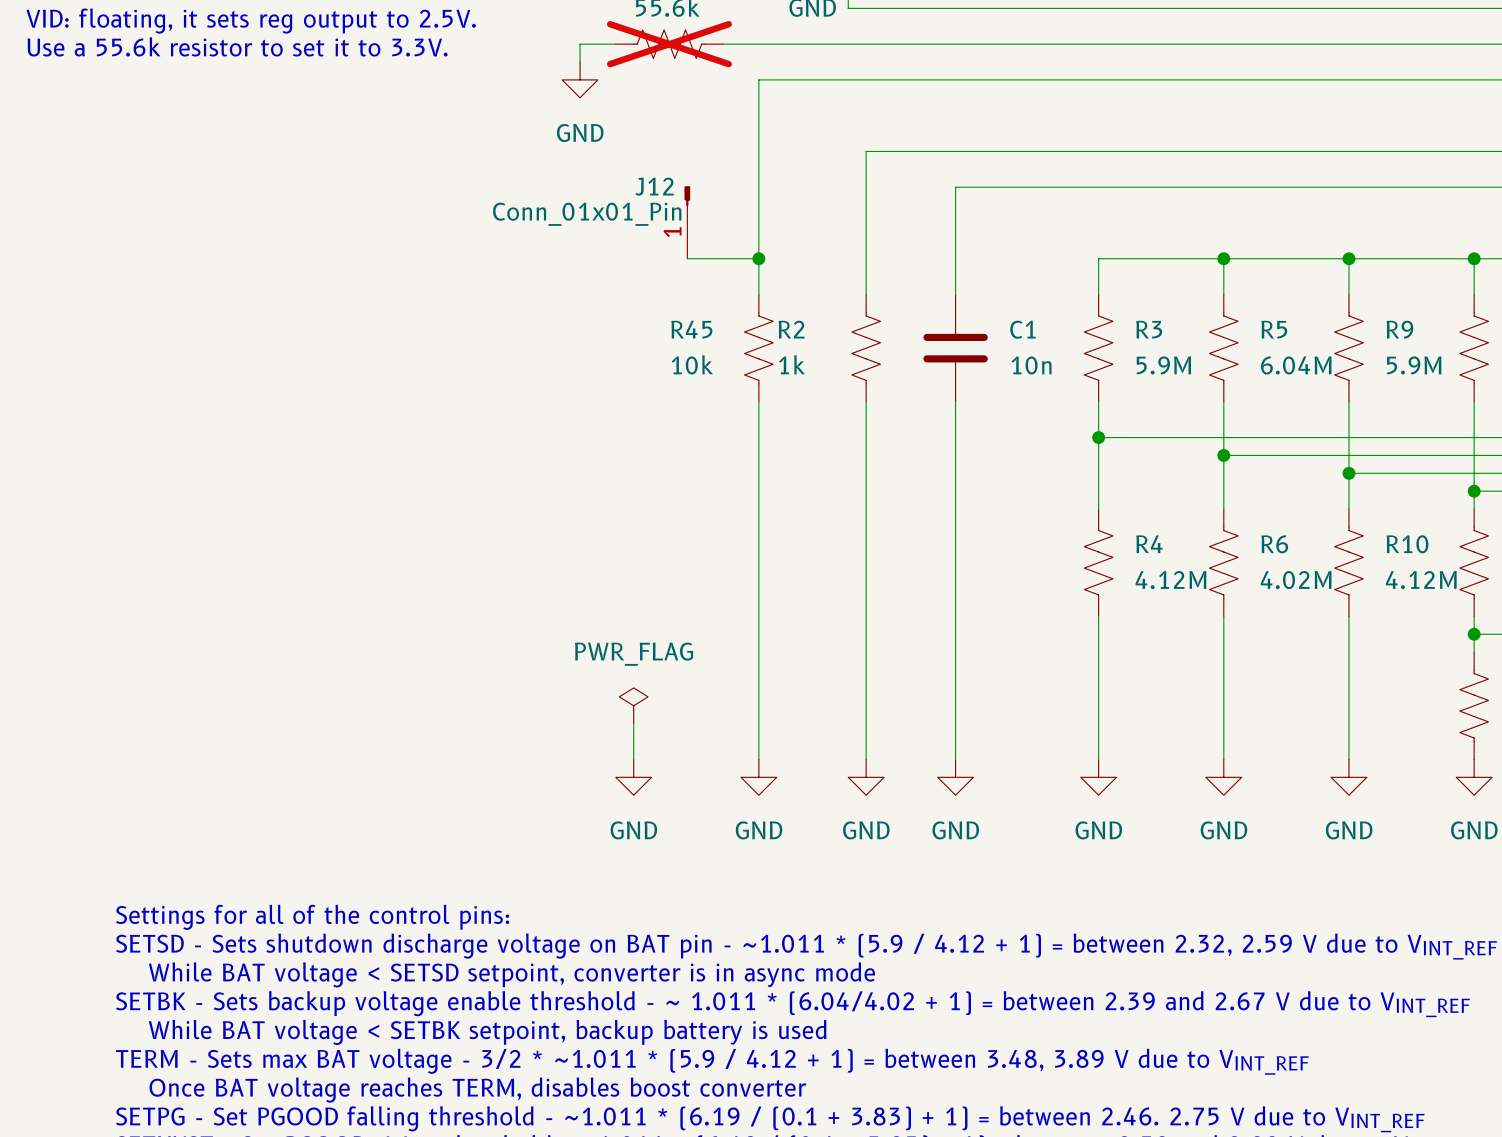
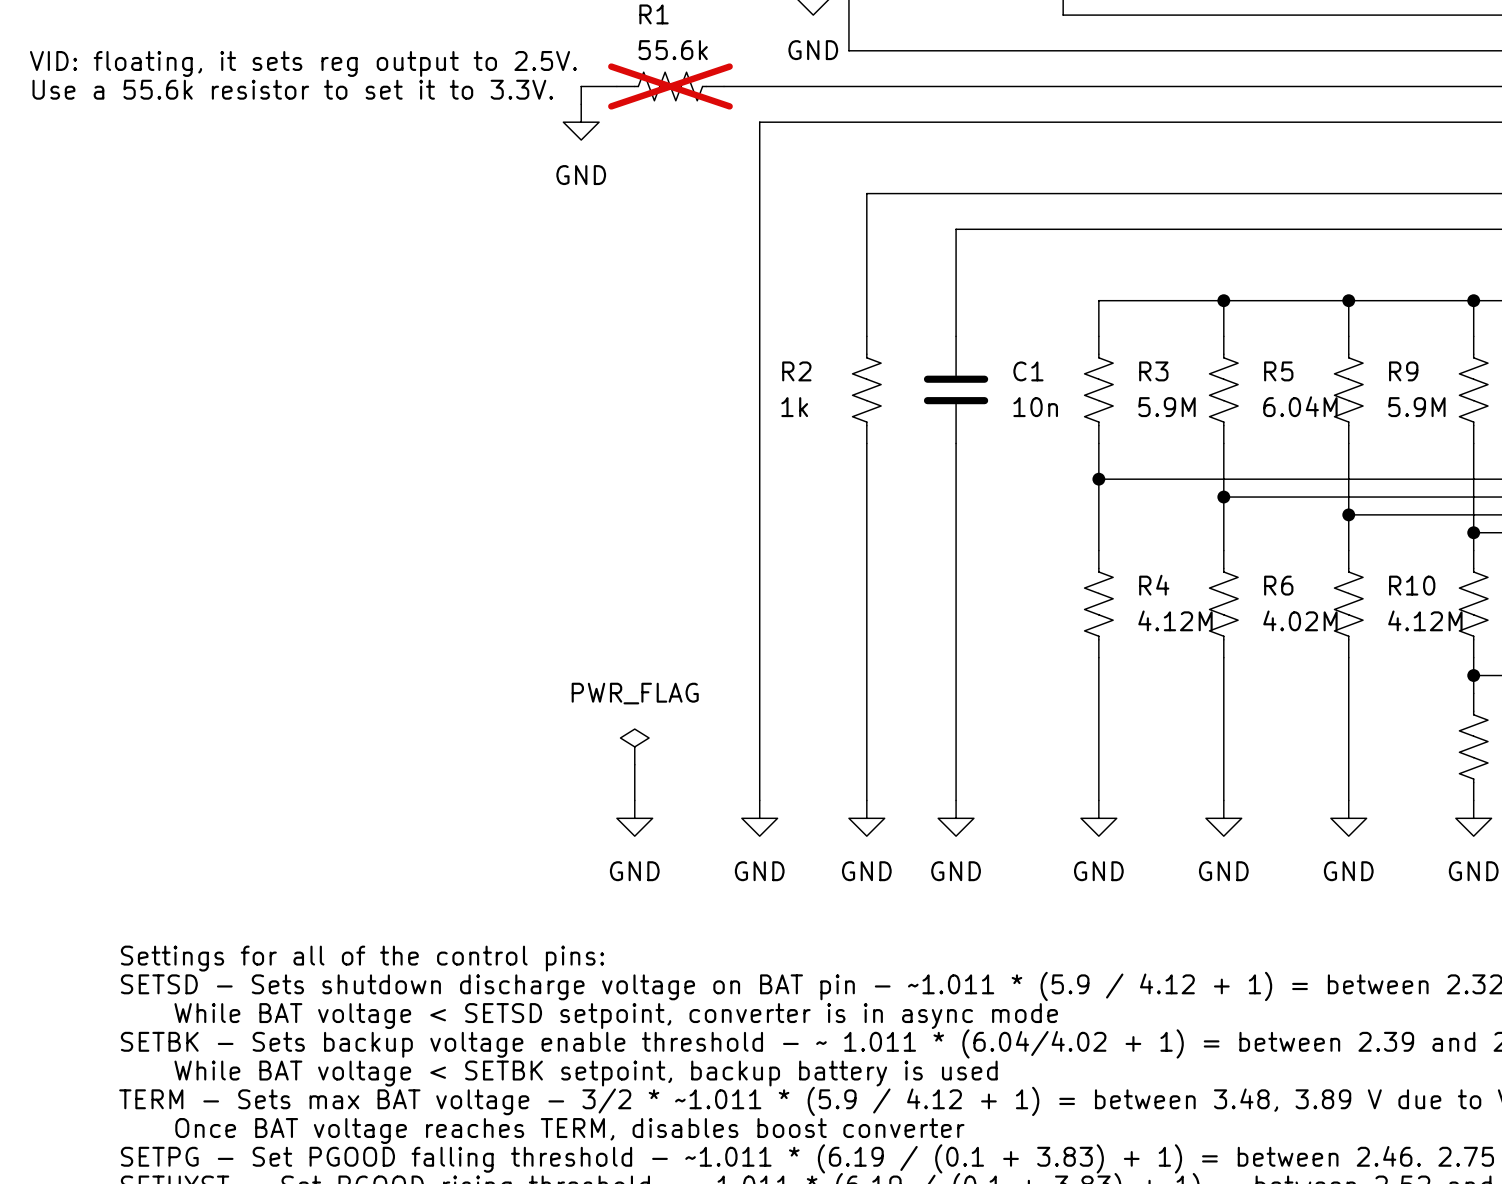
J12: Conn_01x01_Pin (687, 222) -> none
wire: (687, 258) (758, 258) -> none
junction: (758, 258) -> none
wire: none -> (759, 336) (759, 443)
R45: 10k (758, 348) -> none

